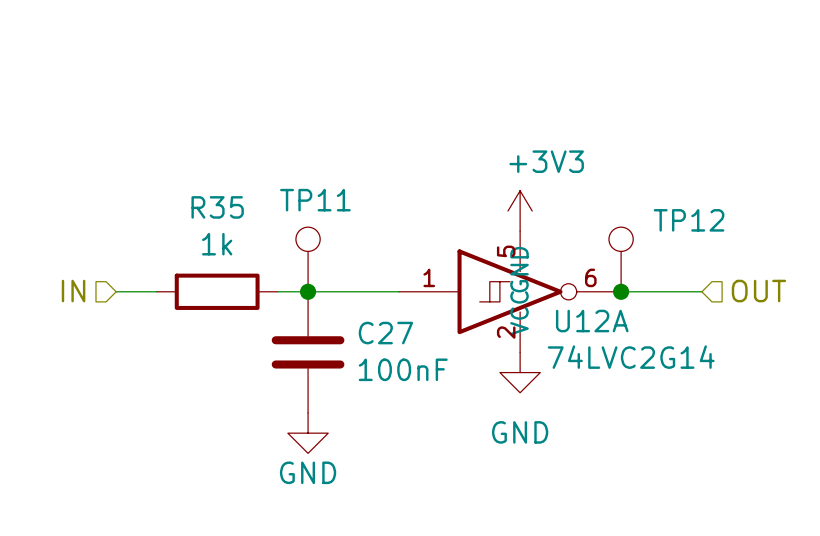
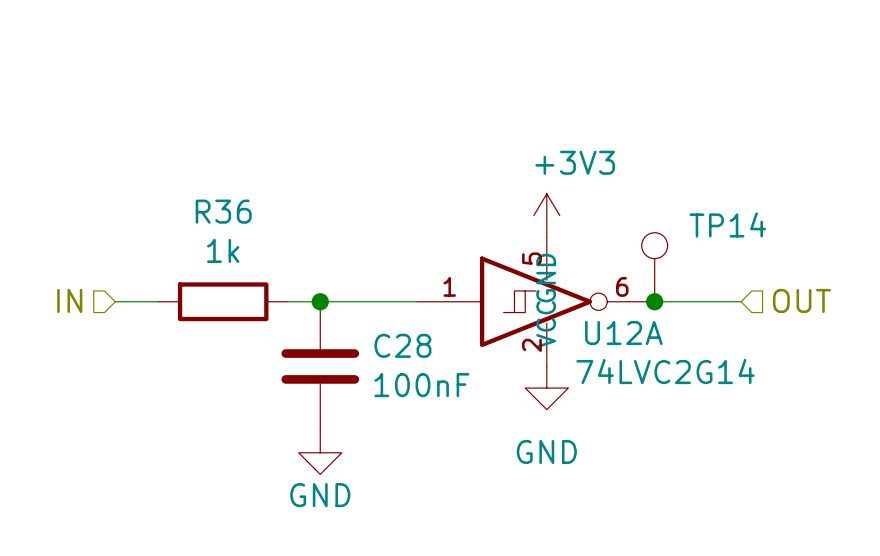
R35 name: R35 (217, 207) -> R36 (223, 211)
TP12 name: TP12 (689, 220) -> TP14 (727, 224)
TP11: (308, 259) -> none
C27 name: C27 (385, 333) -> C28 (402, 345)

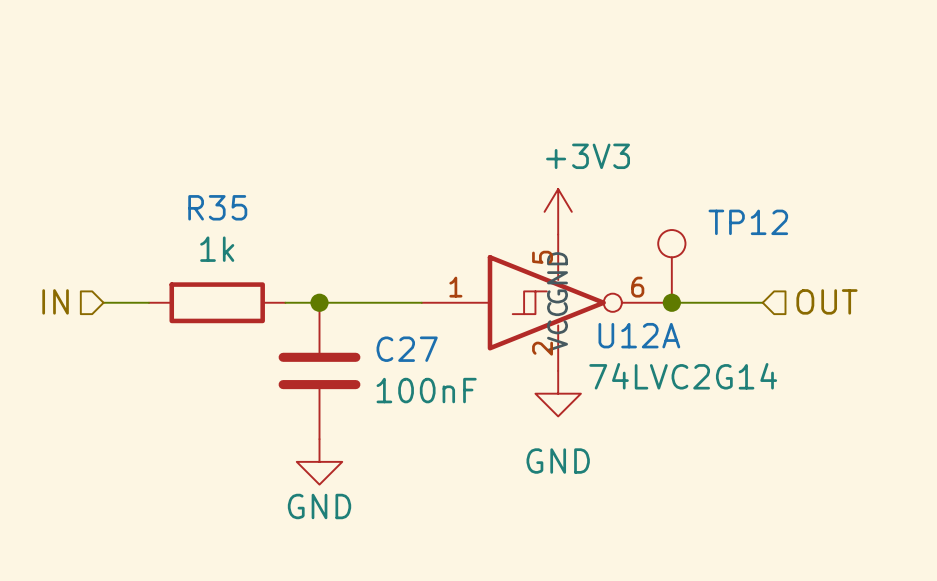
R36 name: R36 (223, 211) -> R35 (217, 207)
TP14 name: TP14 (727, 224) -> TP12 (748, 222)
C28 name: C28 (402, 345) -> C27 (407, 349)

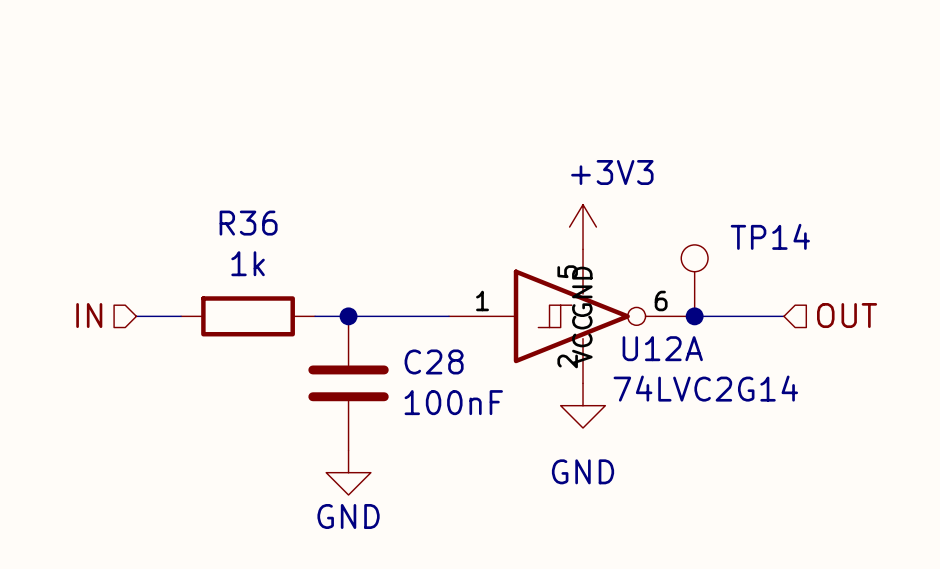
R35 name: R35 (217, 207) -> R36 (248, 223)
TP12 name: TP12 (748, 222) -> TP14 (770, 236)
C27 name: C27 (407, 349) -> C28 (434, 361)

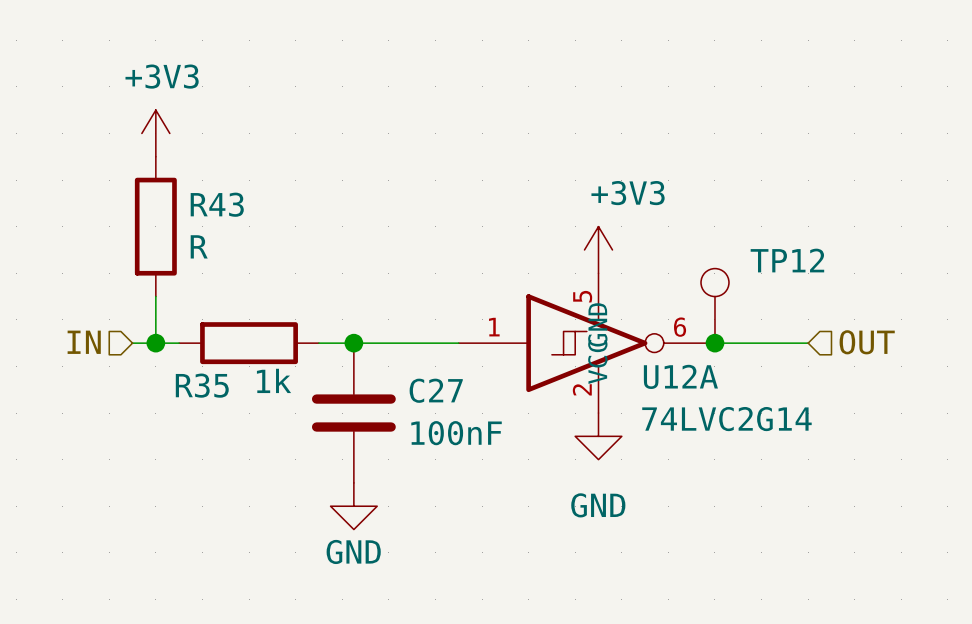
power symbol: none -> +3V3 (155, 133)
R43: none -> R (155, 226)
R36 name: R36 (248, 223) -> R35 (202, 385)
TP14 name: TP14 (770, 236) -> TP12 (787, 260)
R36 value position: 1k (248, 263) -> 1k (274, 380)
wire: none -> (155, 296) (155, 343)
junction: none -> (155, 343)
C28 name: C28 (434, 361) -> C27 (436, 390)

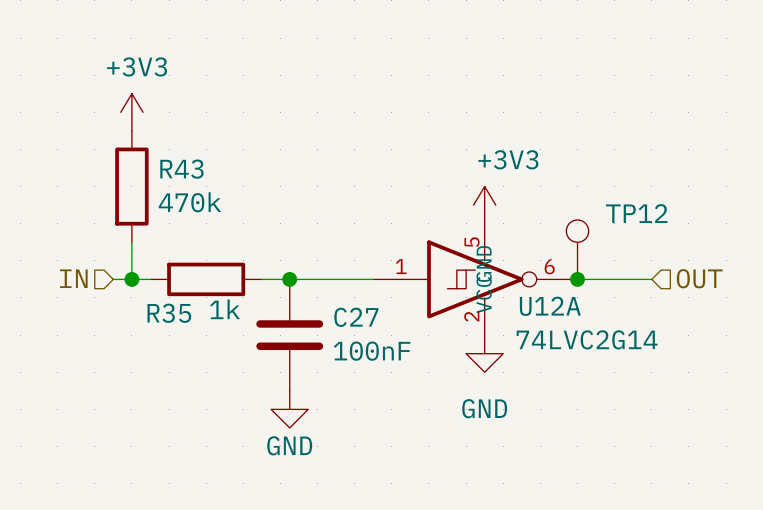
R43 value: R (199, 246) -> 470k (189, 202)

